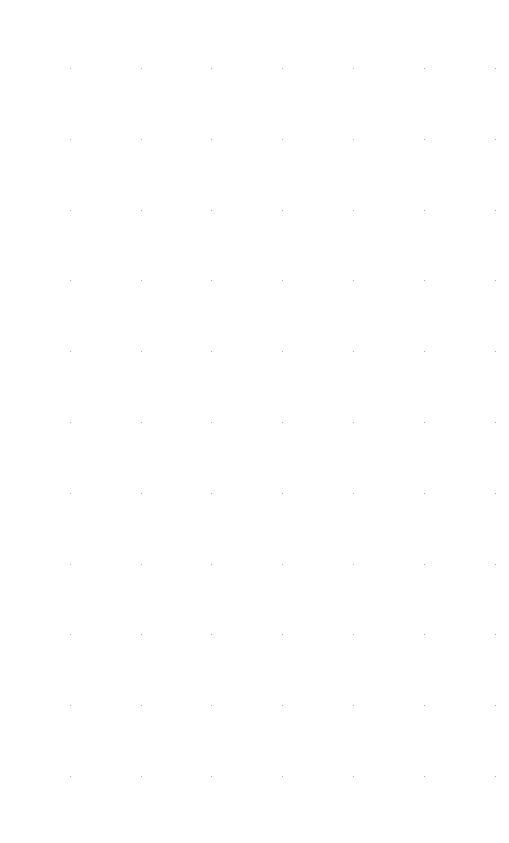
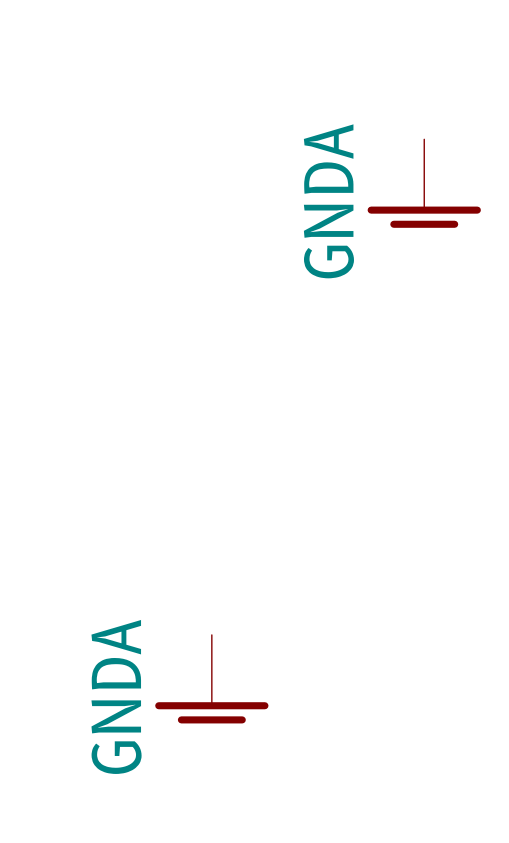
power symbol: none -> GNDA (424, 183)
power symbol: none -> GNDA (211, 679)

